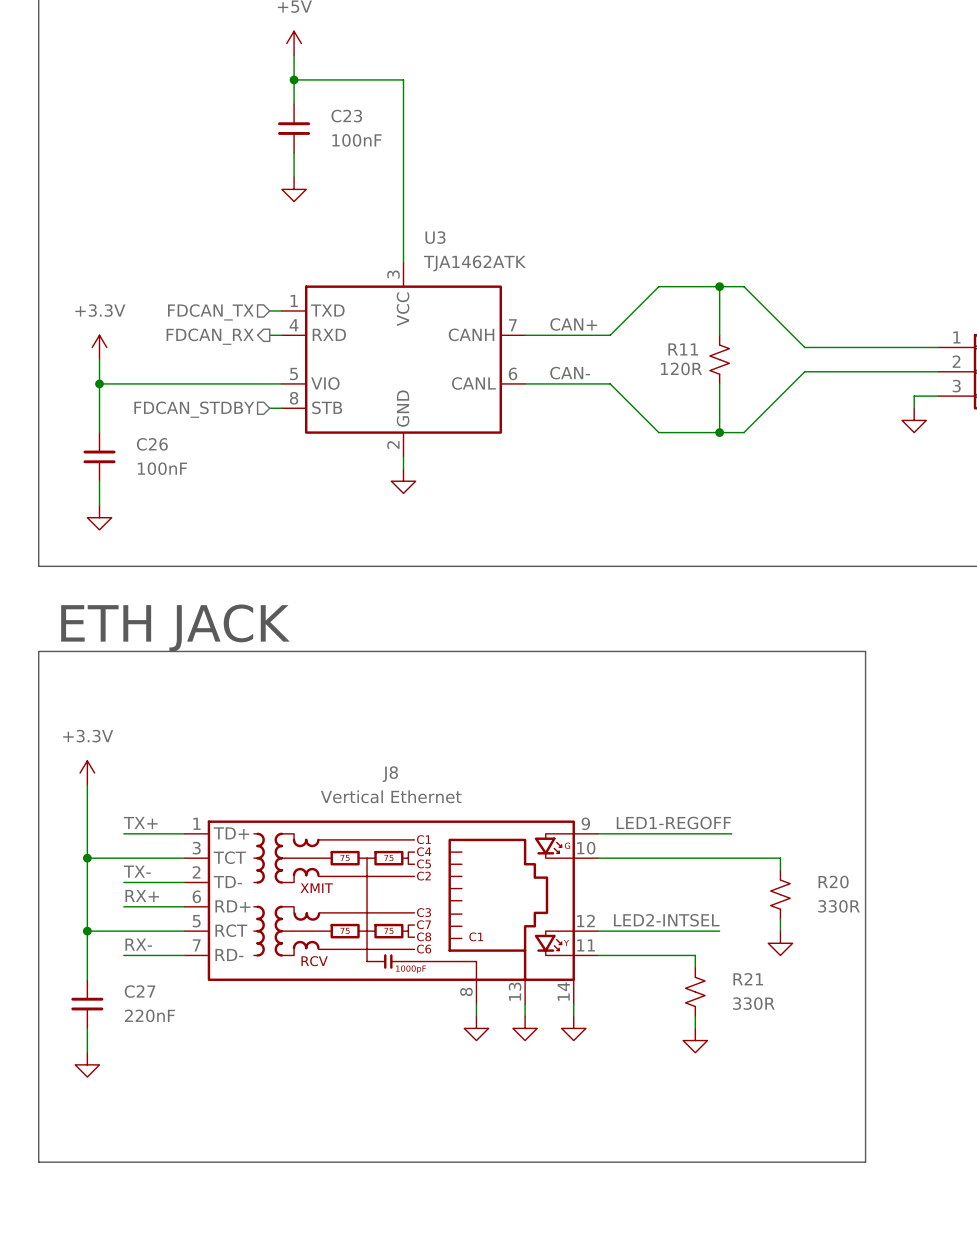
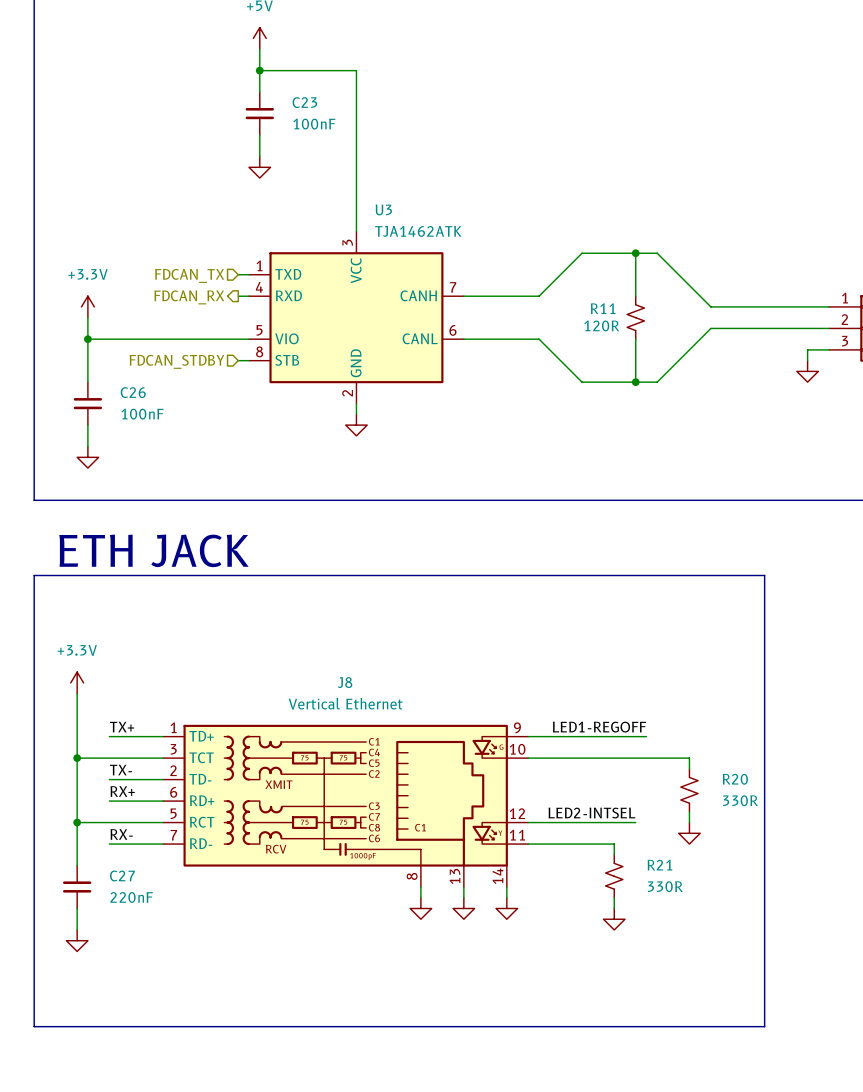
label: CAN+ (573, 324) -> none
label: CAN- (570, 373) -> none

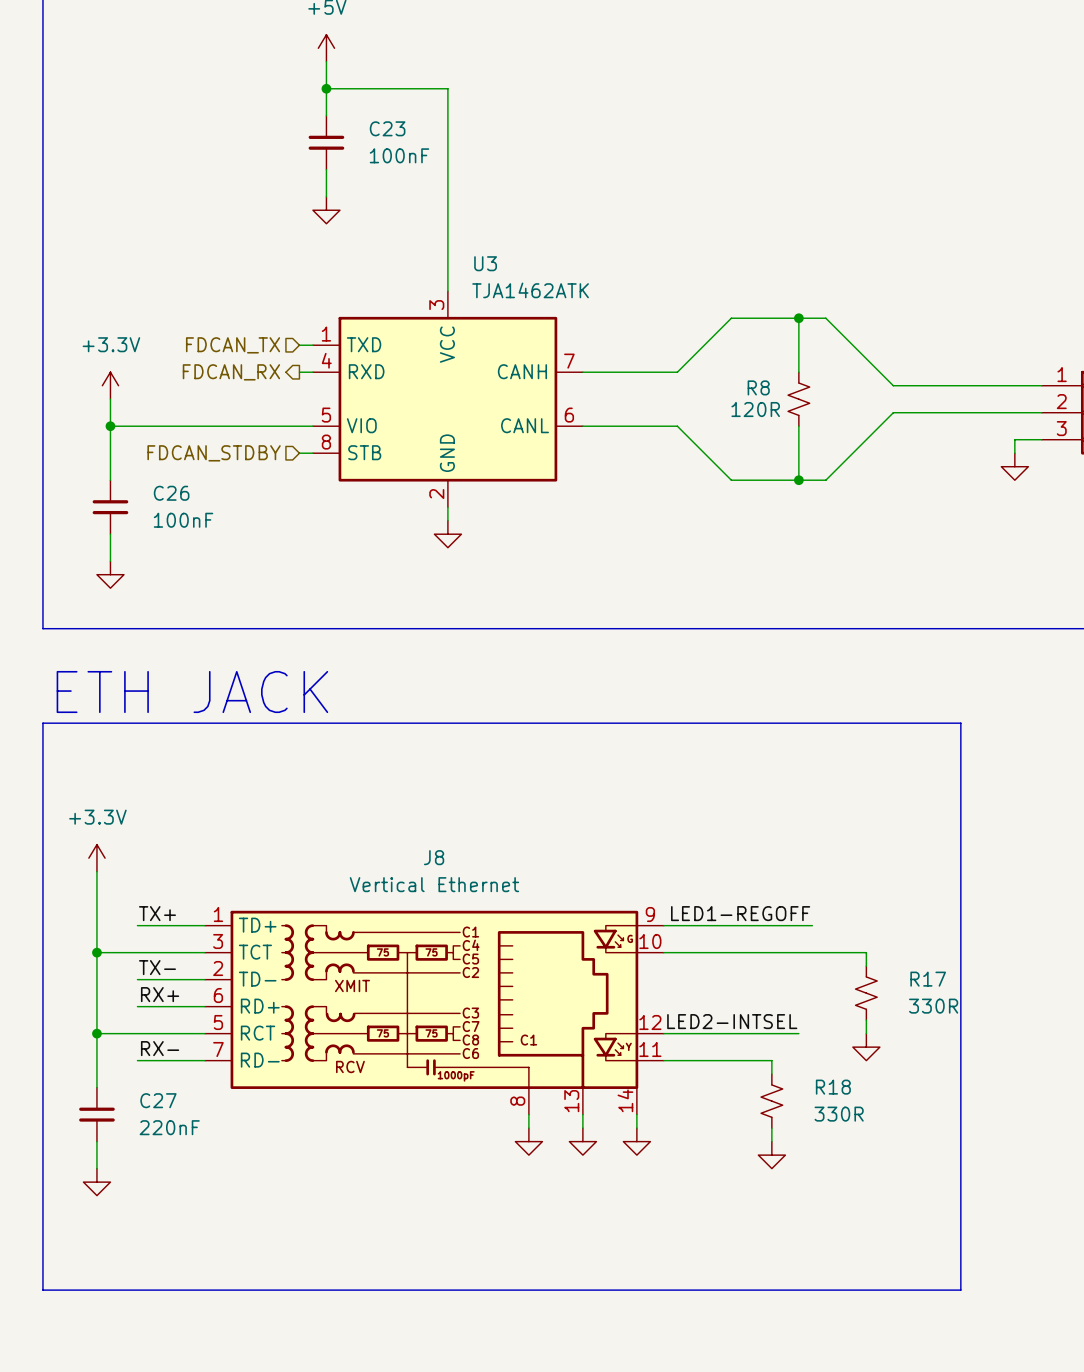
R11 name: R11 (603, 308) -> R8 (758, 387)
R20 name: R20 (735, 779) -> R17 (928, 979)
R21 name: R21 (659, 865) -> R18 (833, 1087)

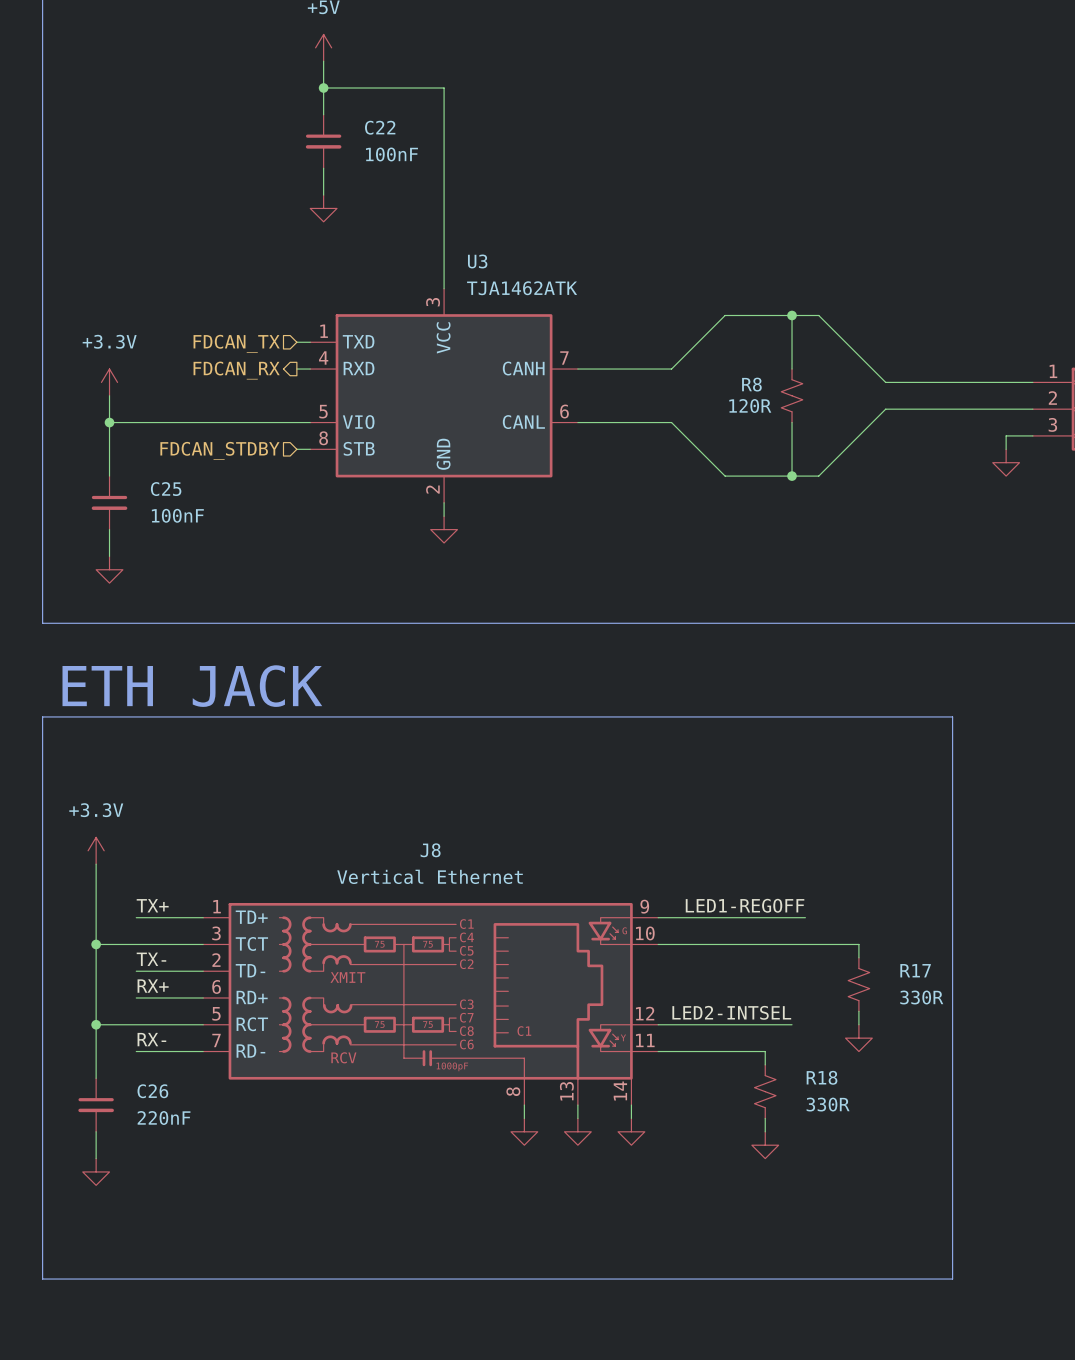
C23: 100nF (326, 142) -> none
C22: none -> 100nF (323, 141)
C26 symbol: [92, 480, 129, 535] -> [78, 1078, 114, 1132]
C25: none -> 100nF (109, 502)
C27: 220nF (96, 1114) -> none

